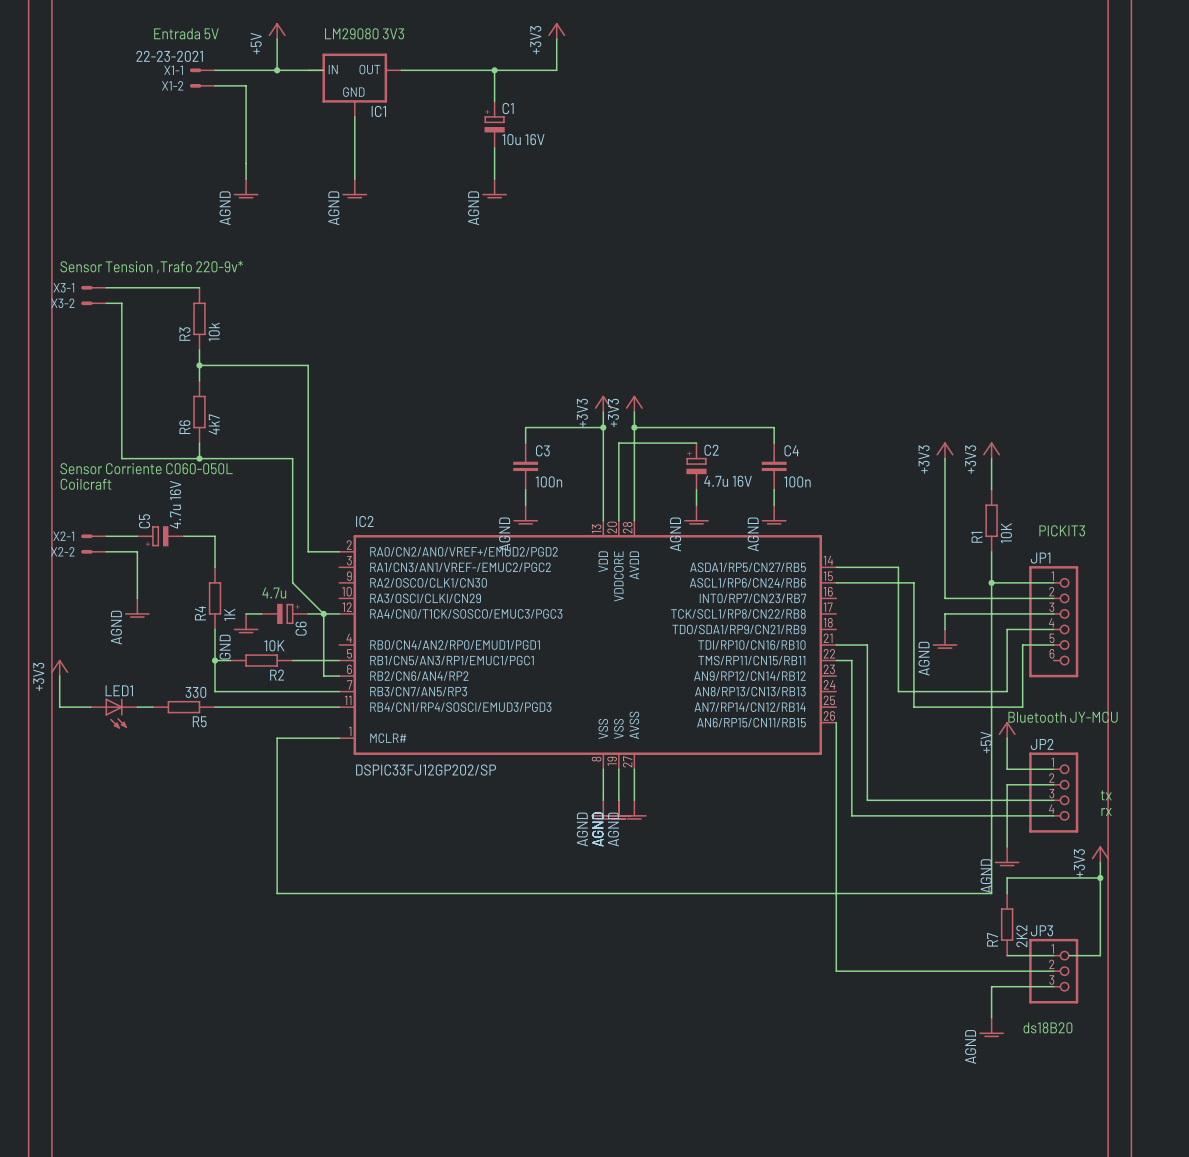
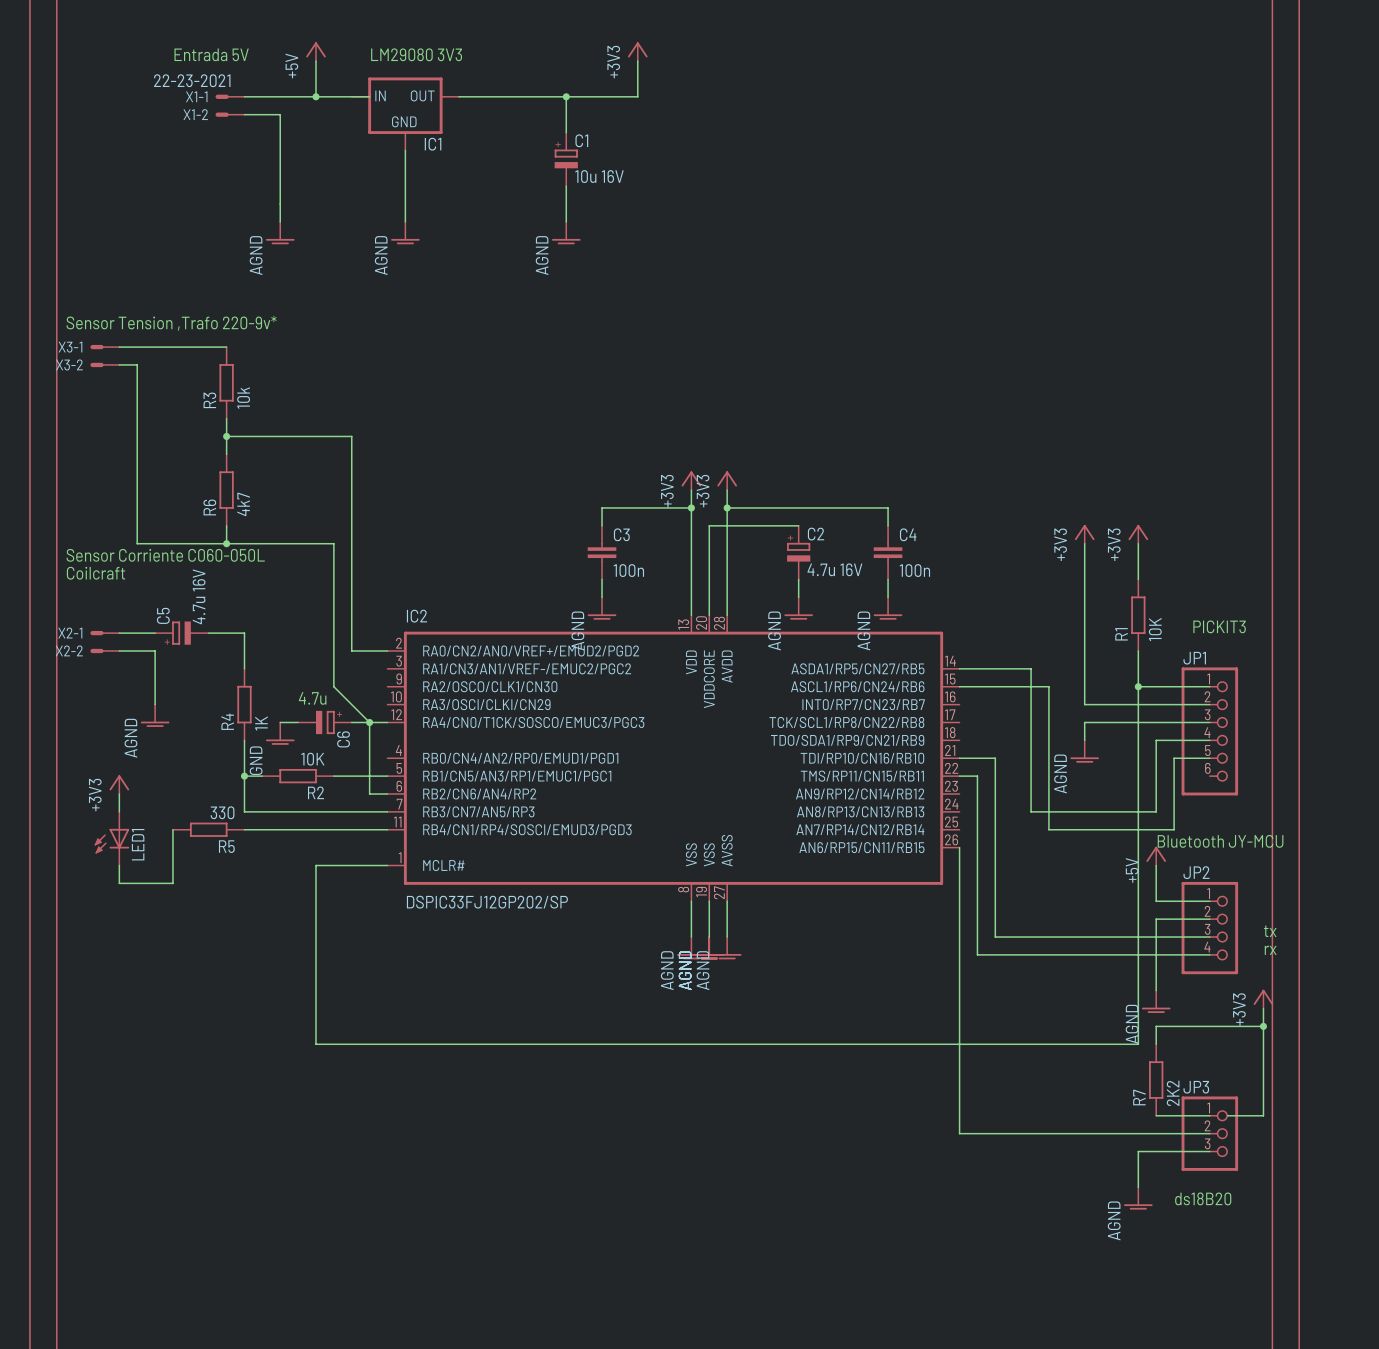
power symbol position: +3V3 (59, 667) -> +3V3 (119, 784)
wire: (59, 676) (59, 707) (90, 707) -> none
wire: none -> (119, 794) (119, 811)
wire: (137, 707) (152, 707) -> (119, 865) (119, 883) (172, 883) (172, 829)
LED1 rotation: 0° (116, 713) -> 90° clockwise (111, 841)

